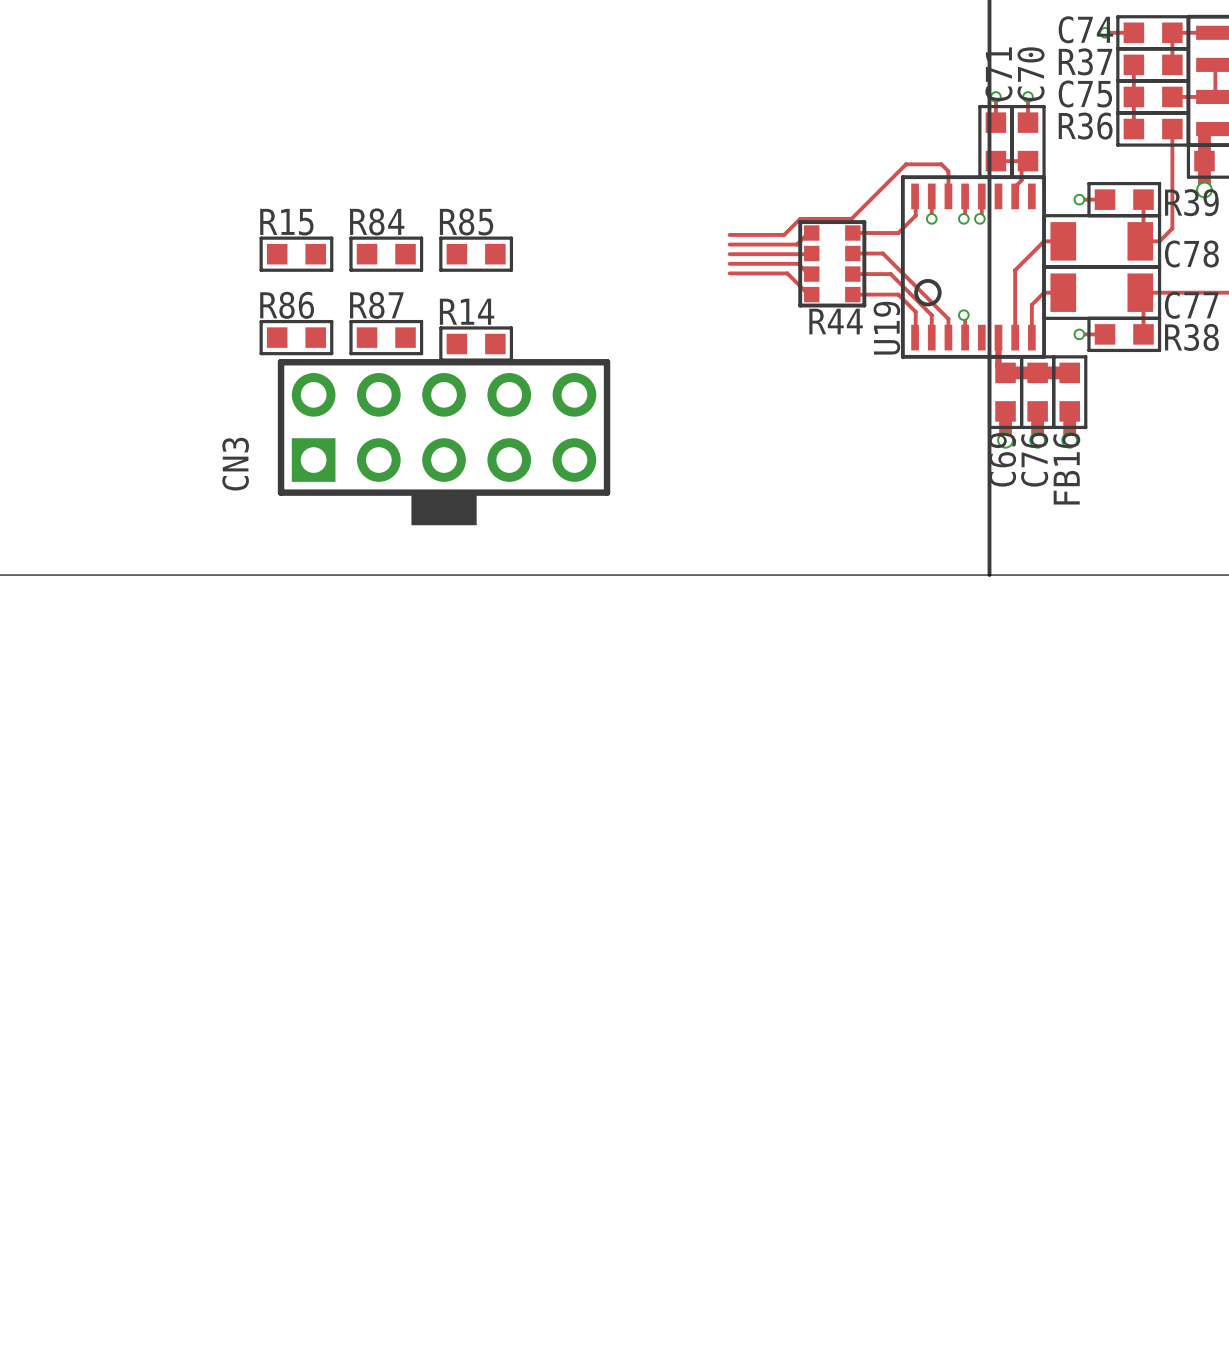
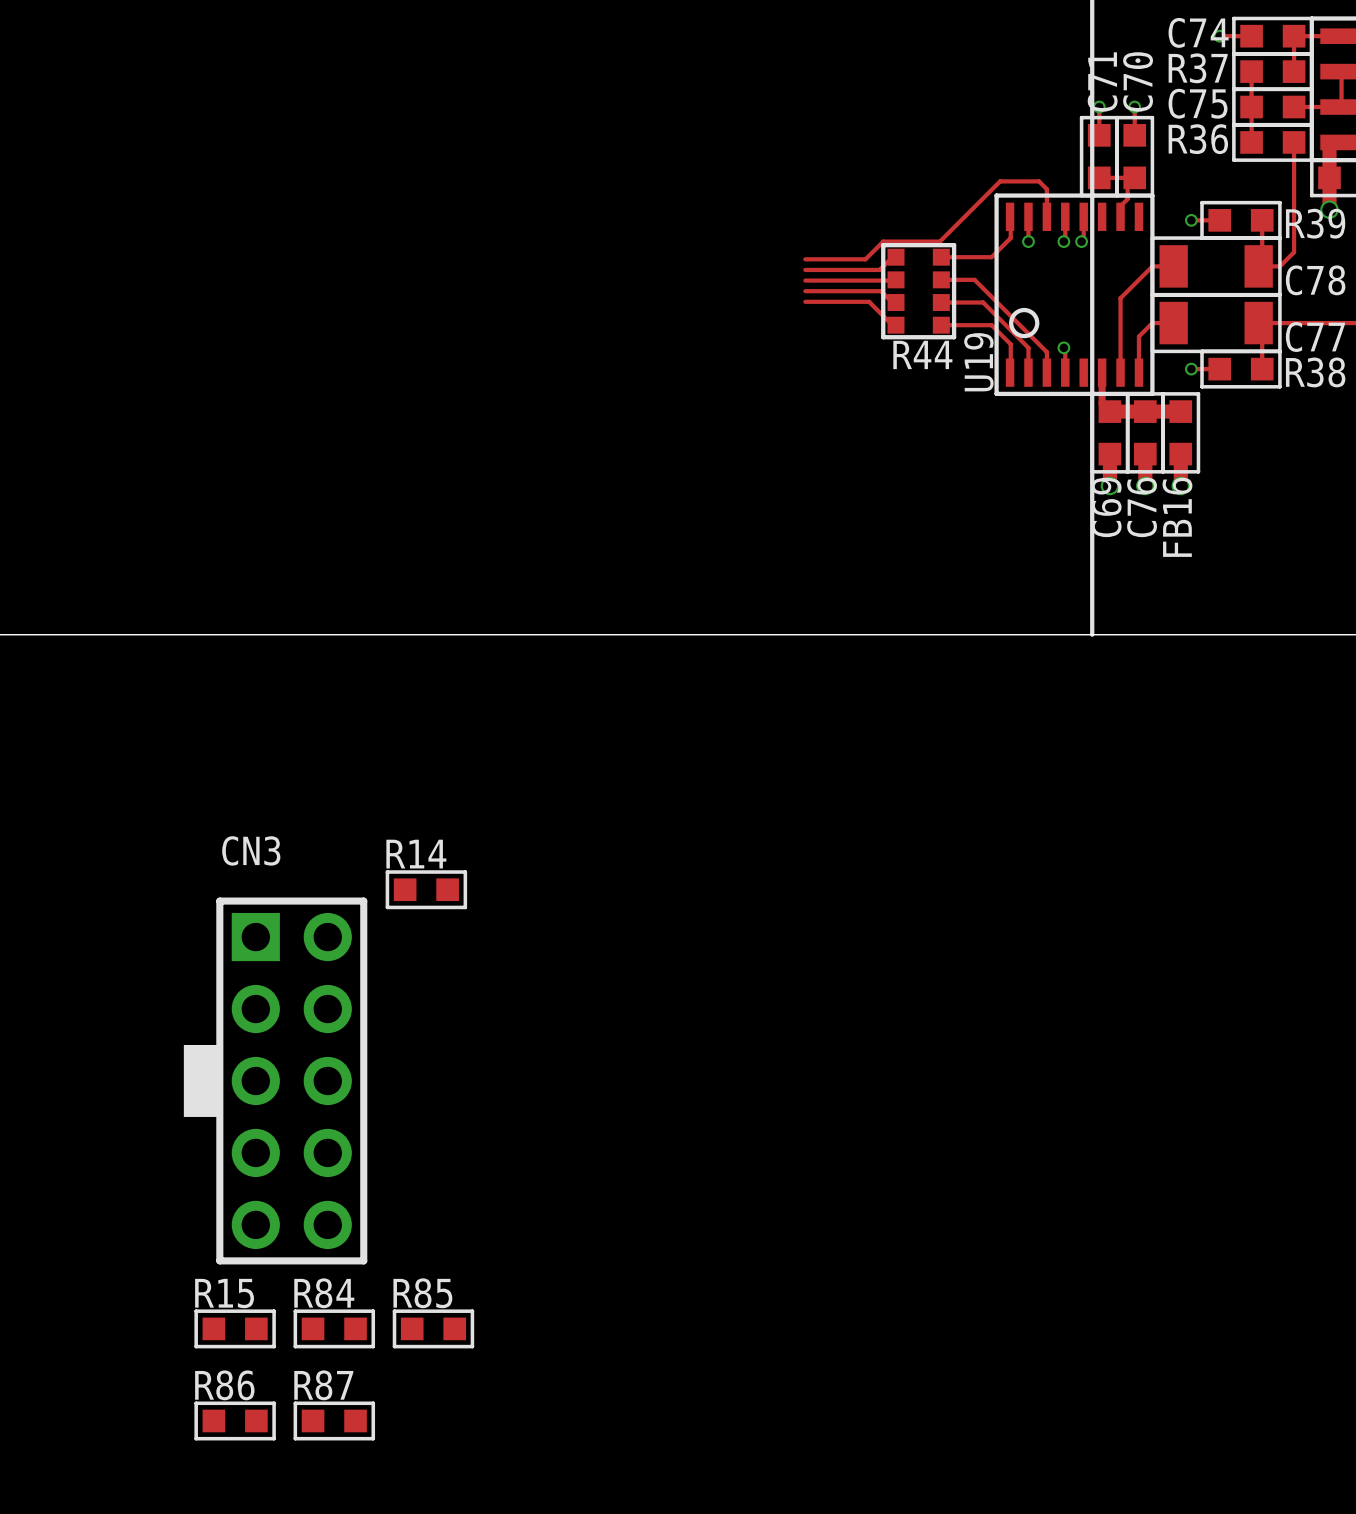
R15 position: (296, 254) -> (235, 1328)
R84 position: (386, 254) -> (334, 1328)
R85 position: (476, 254) -> (433, 1328)
R86 position: (296, 337) -> (235, 1420)
R87 position: (386, 337) -> (334, 1420)
R14 position: (476, 344) -> (426, 889)
CN3 rotation: 0° (444, 442) -> 90° clockwise (275, 1080)
CN3 position: (444, 442) -> (275, 1080)

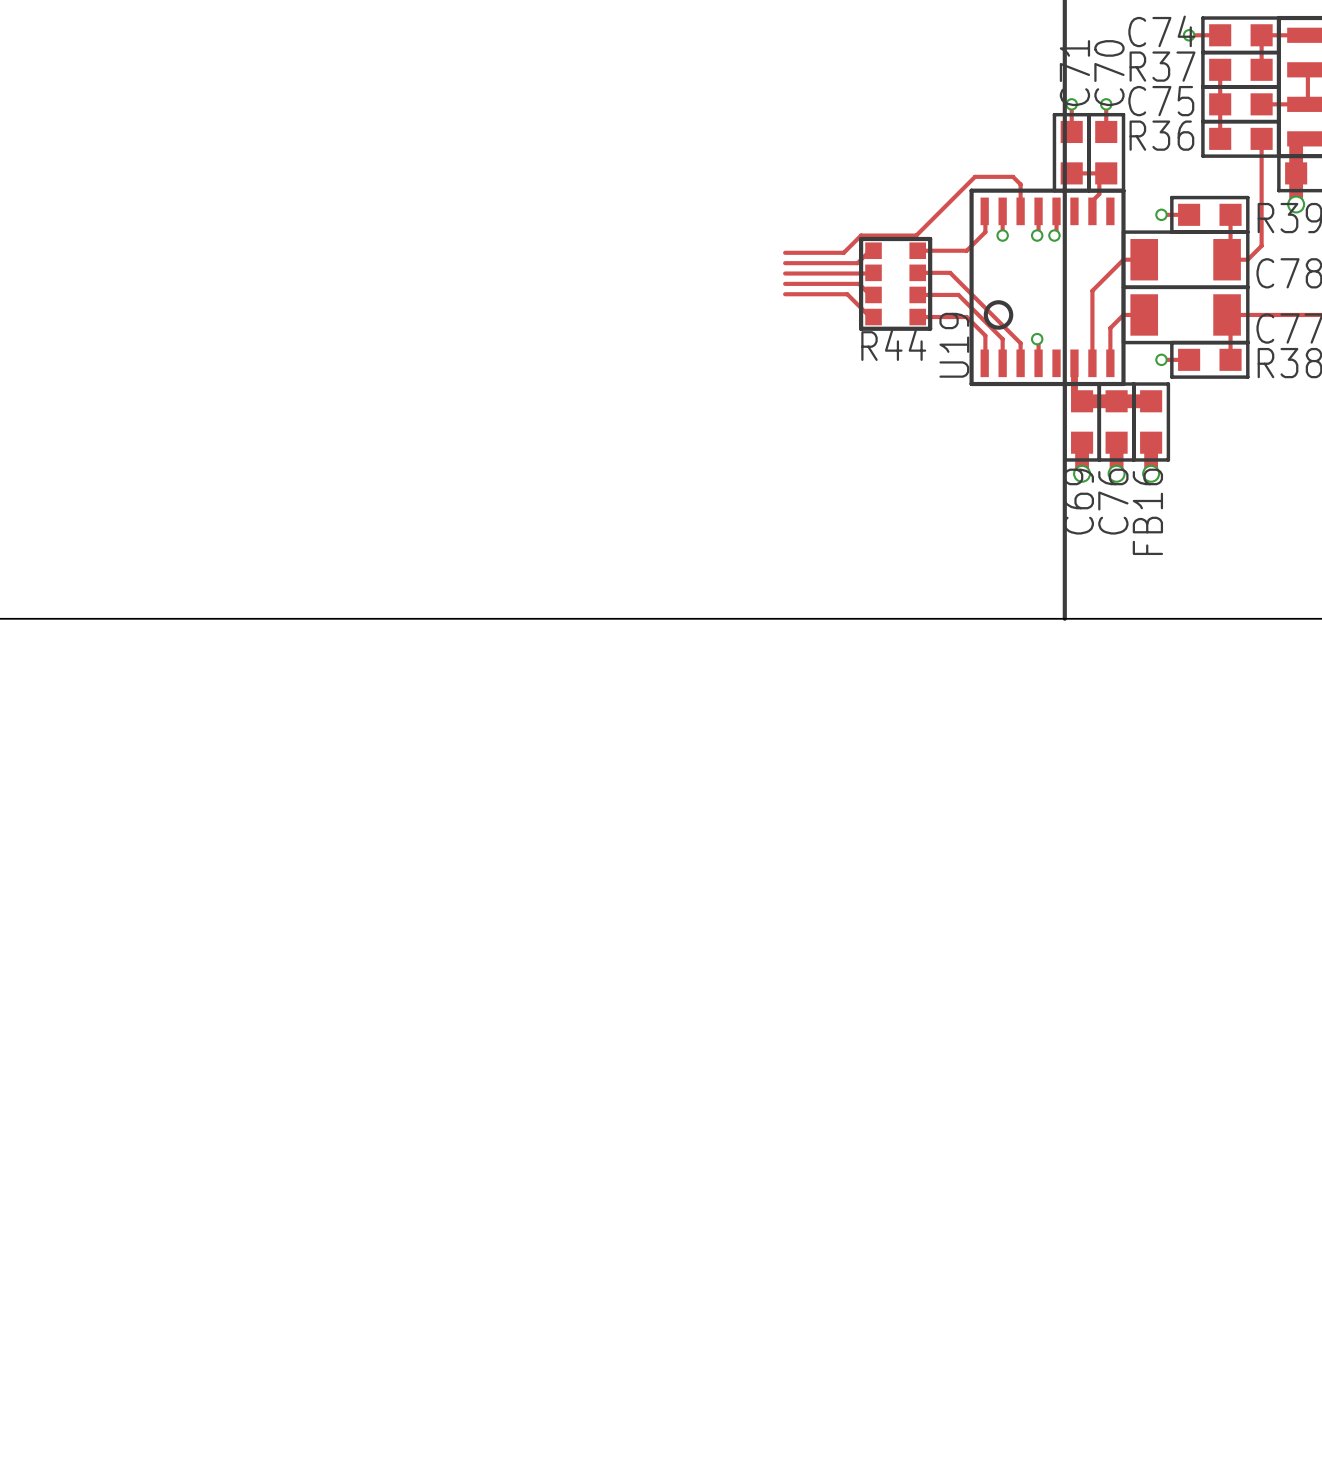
R14: (426, 889) -> none
CN3: (275, 1080) -> none
R15: (235, 1328) -> none
R84: (334, 1328) -> none
R85: (433, 1328) -> none
R86: (235, 1420) -> none
R87: (334, 1420) -> none

